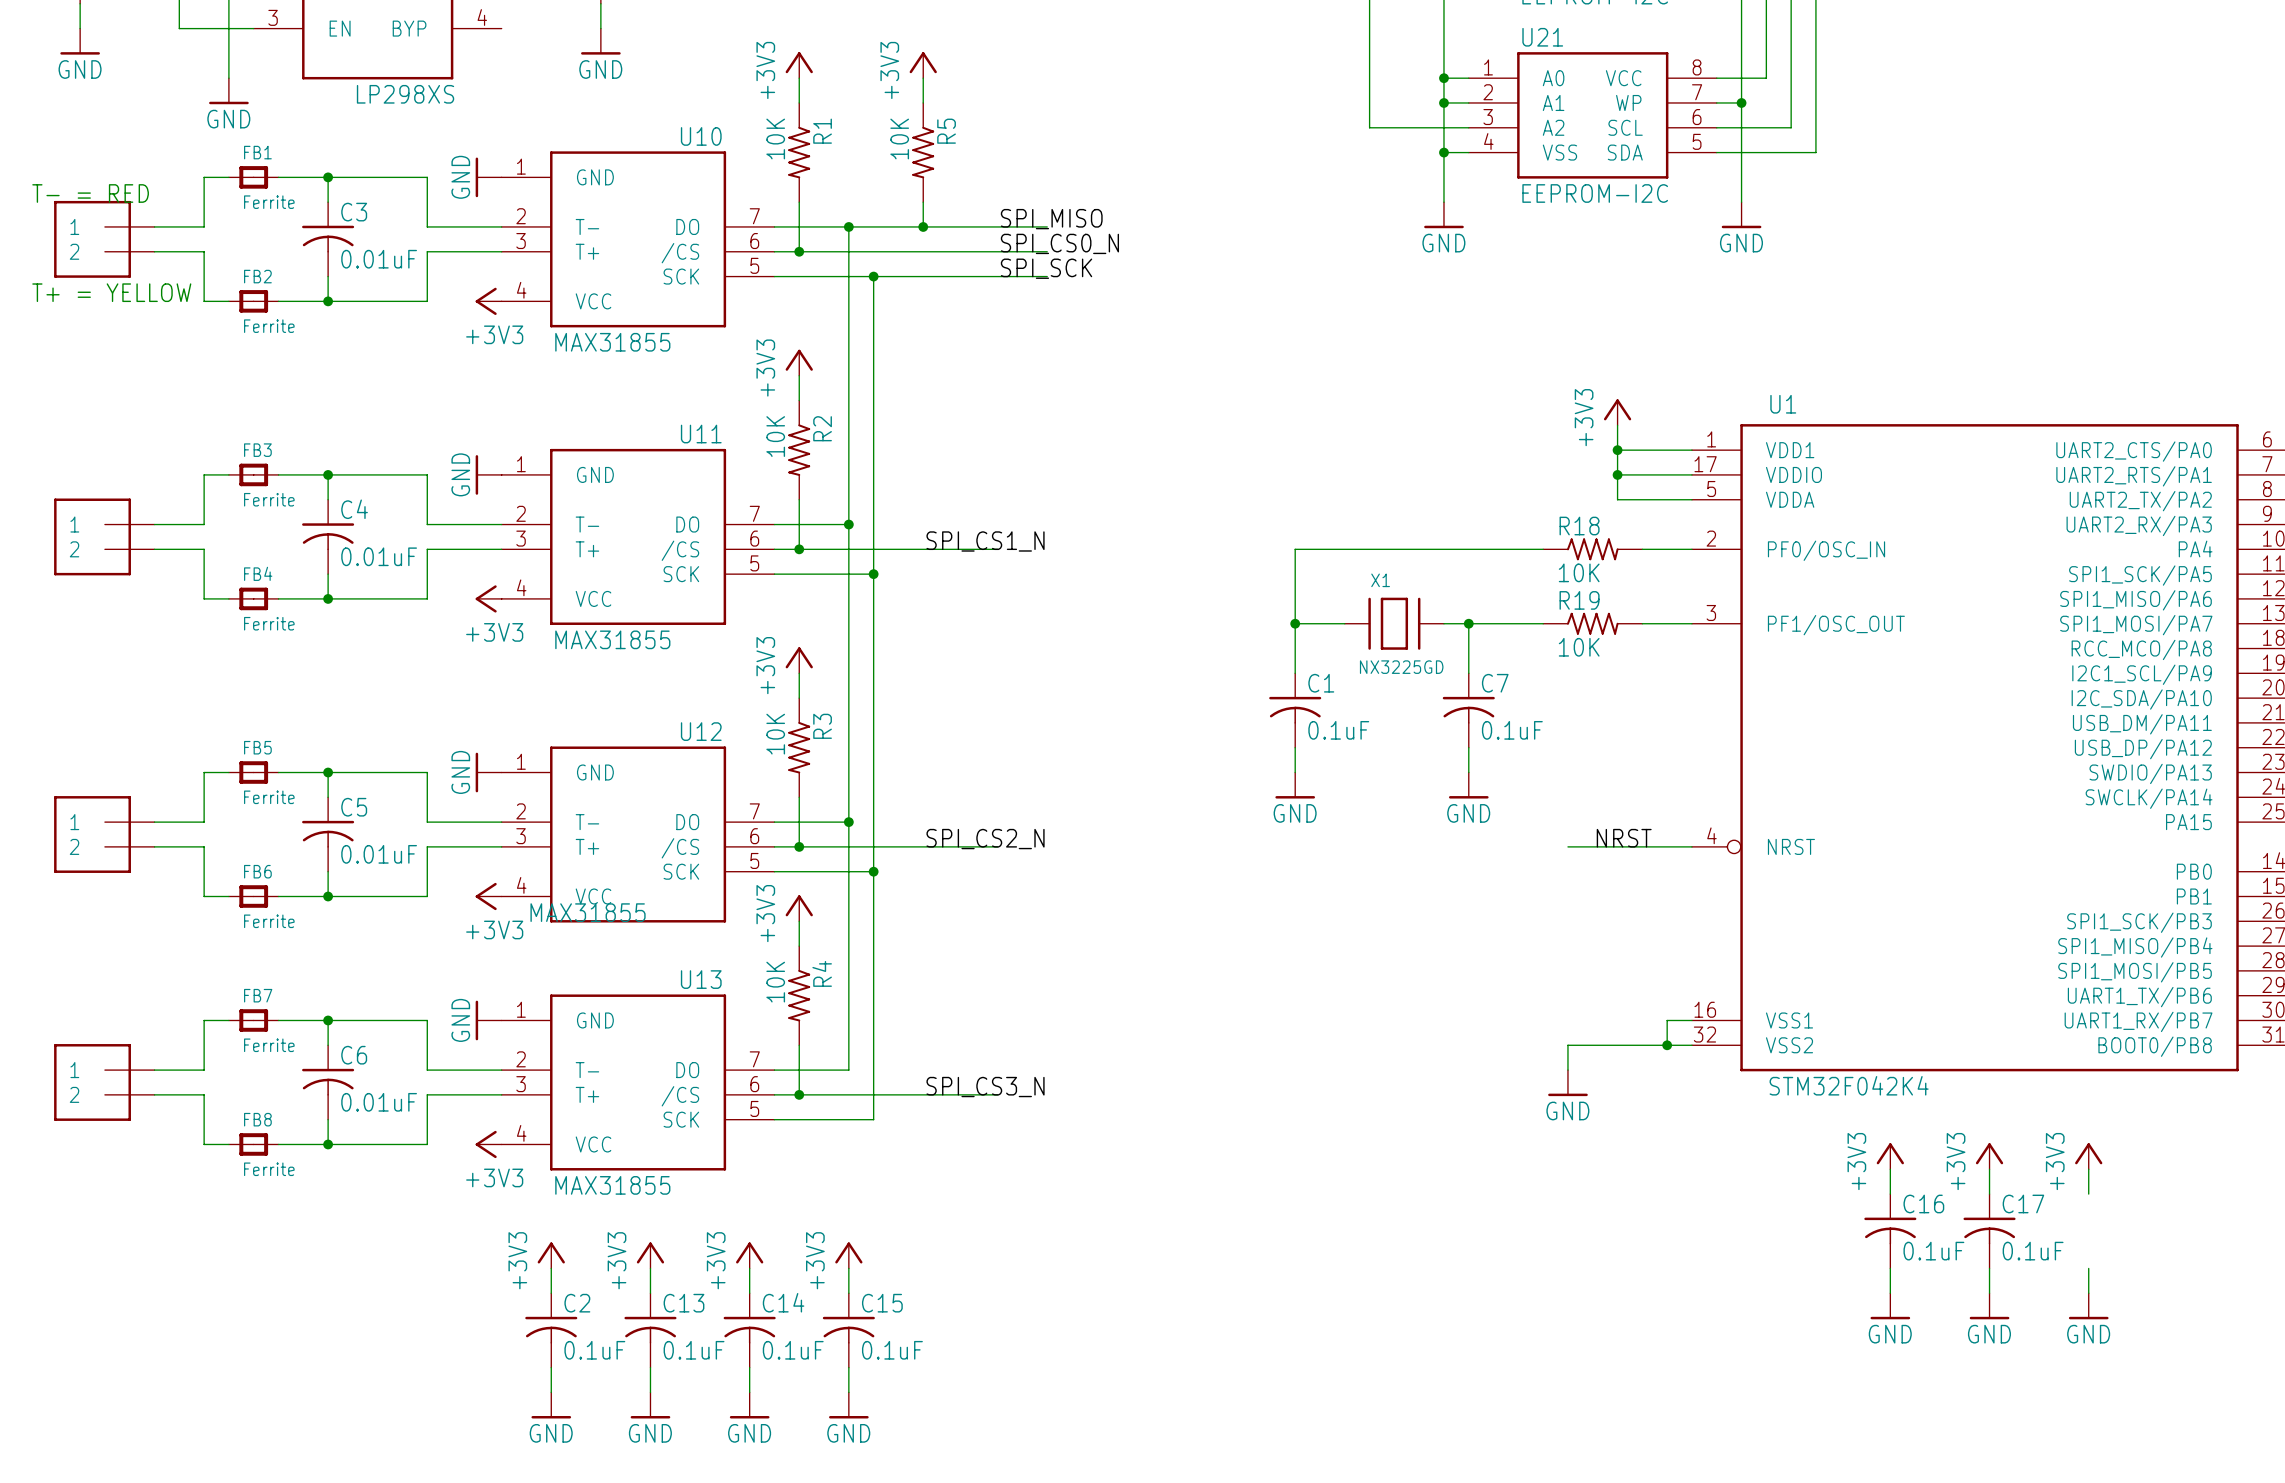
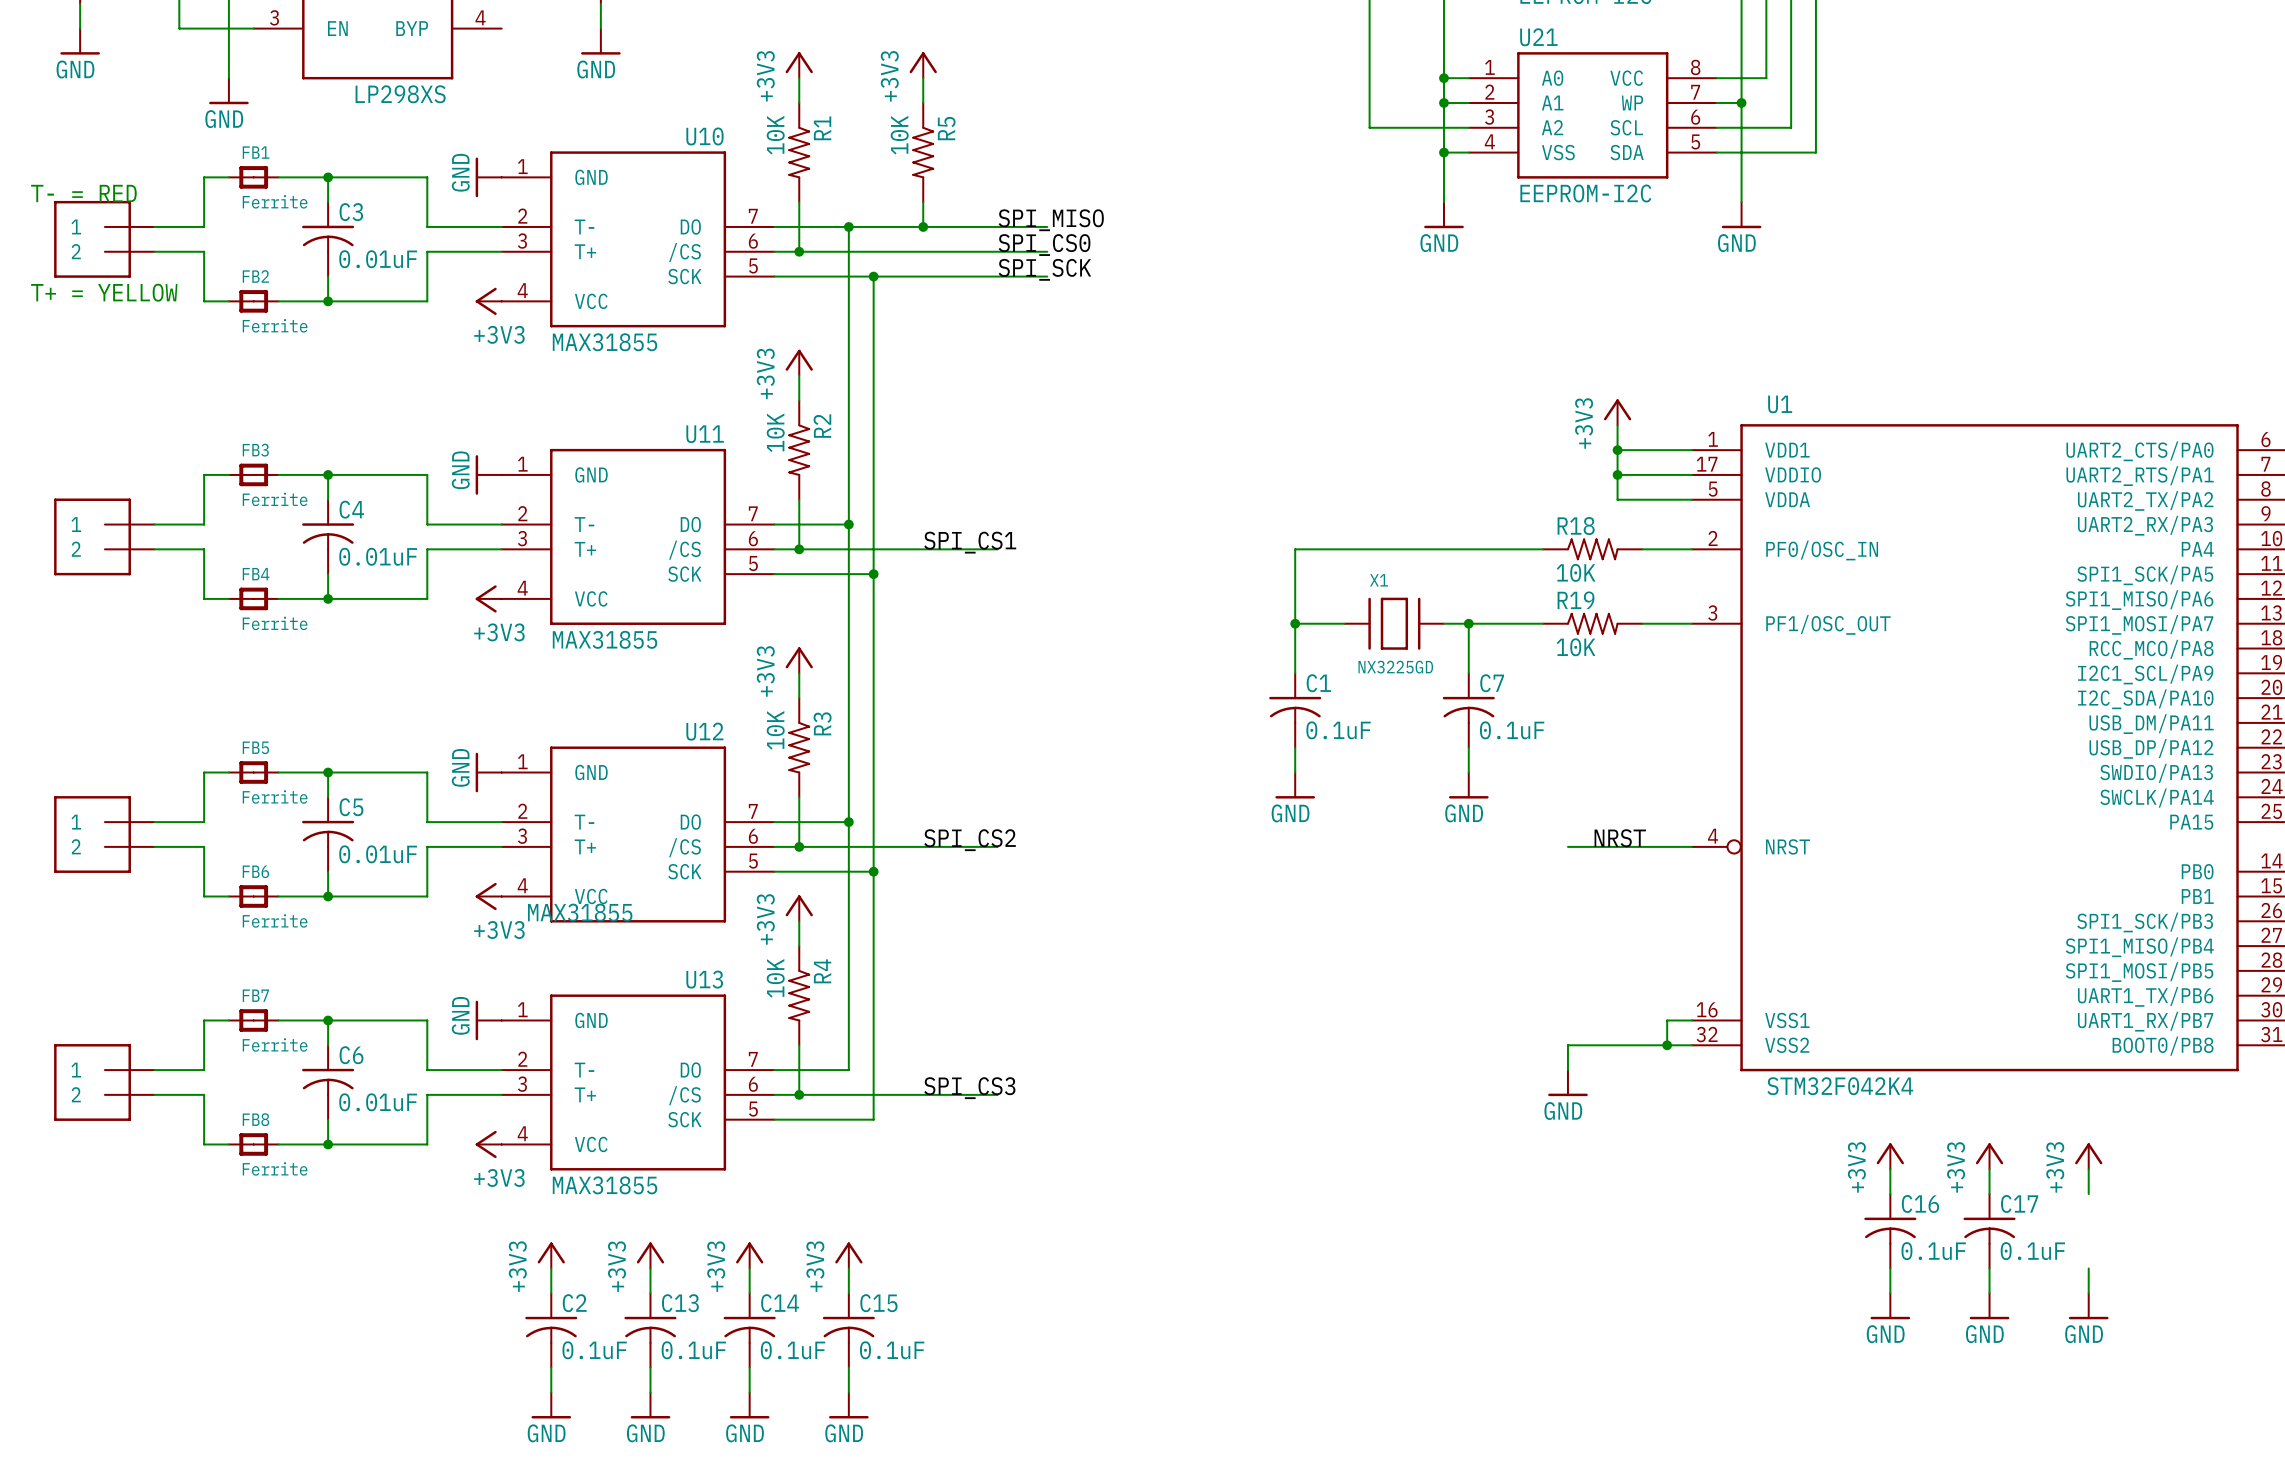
label: SPI_CS0_N (1059, 243) -> SPI_CS0 (1044, 245)
label: SPI_CS1_N (985, 541) -> SPI_CS1 (970, 542)
label: SPI_CS2_N (985, 839) -> SPI_CS2 (970, 840)
label: SPI_CS3_N (985, 1087) -> SPI_CS3 (969, 1088)

